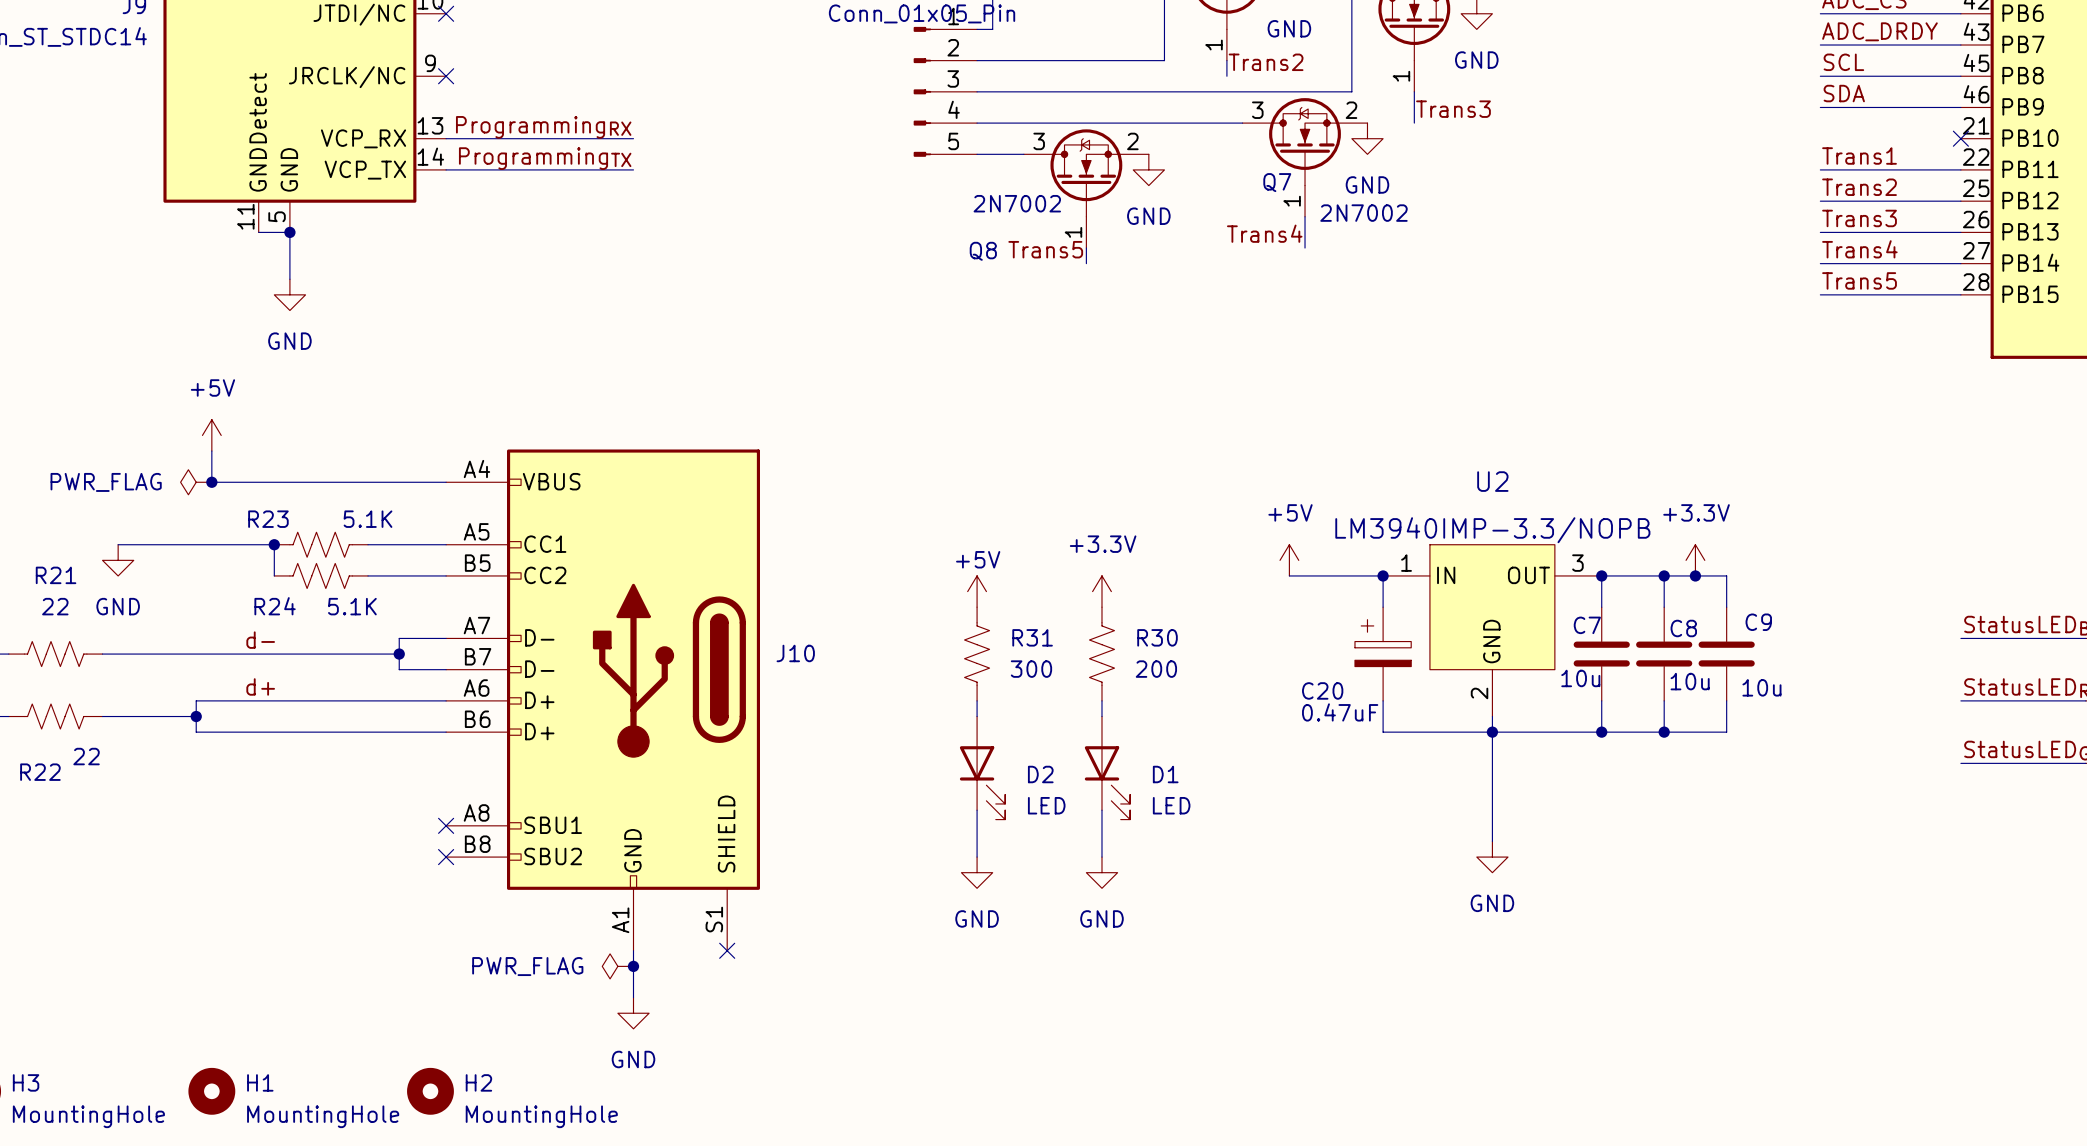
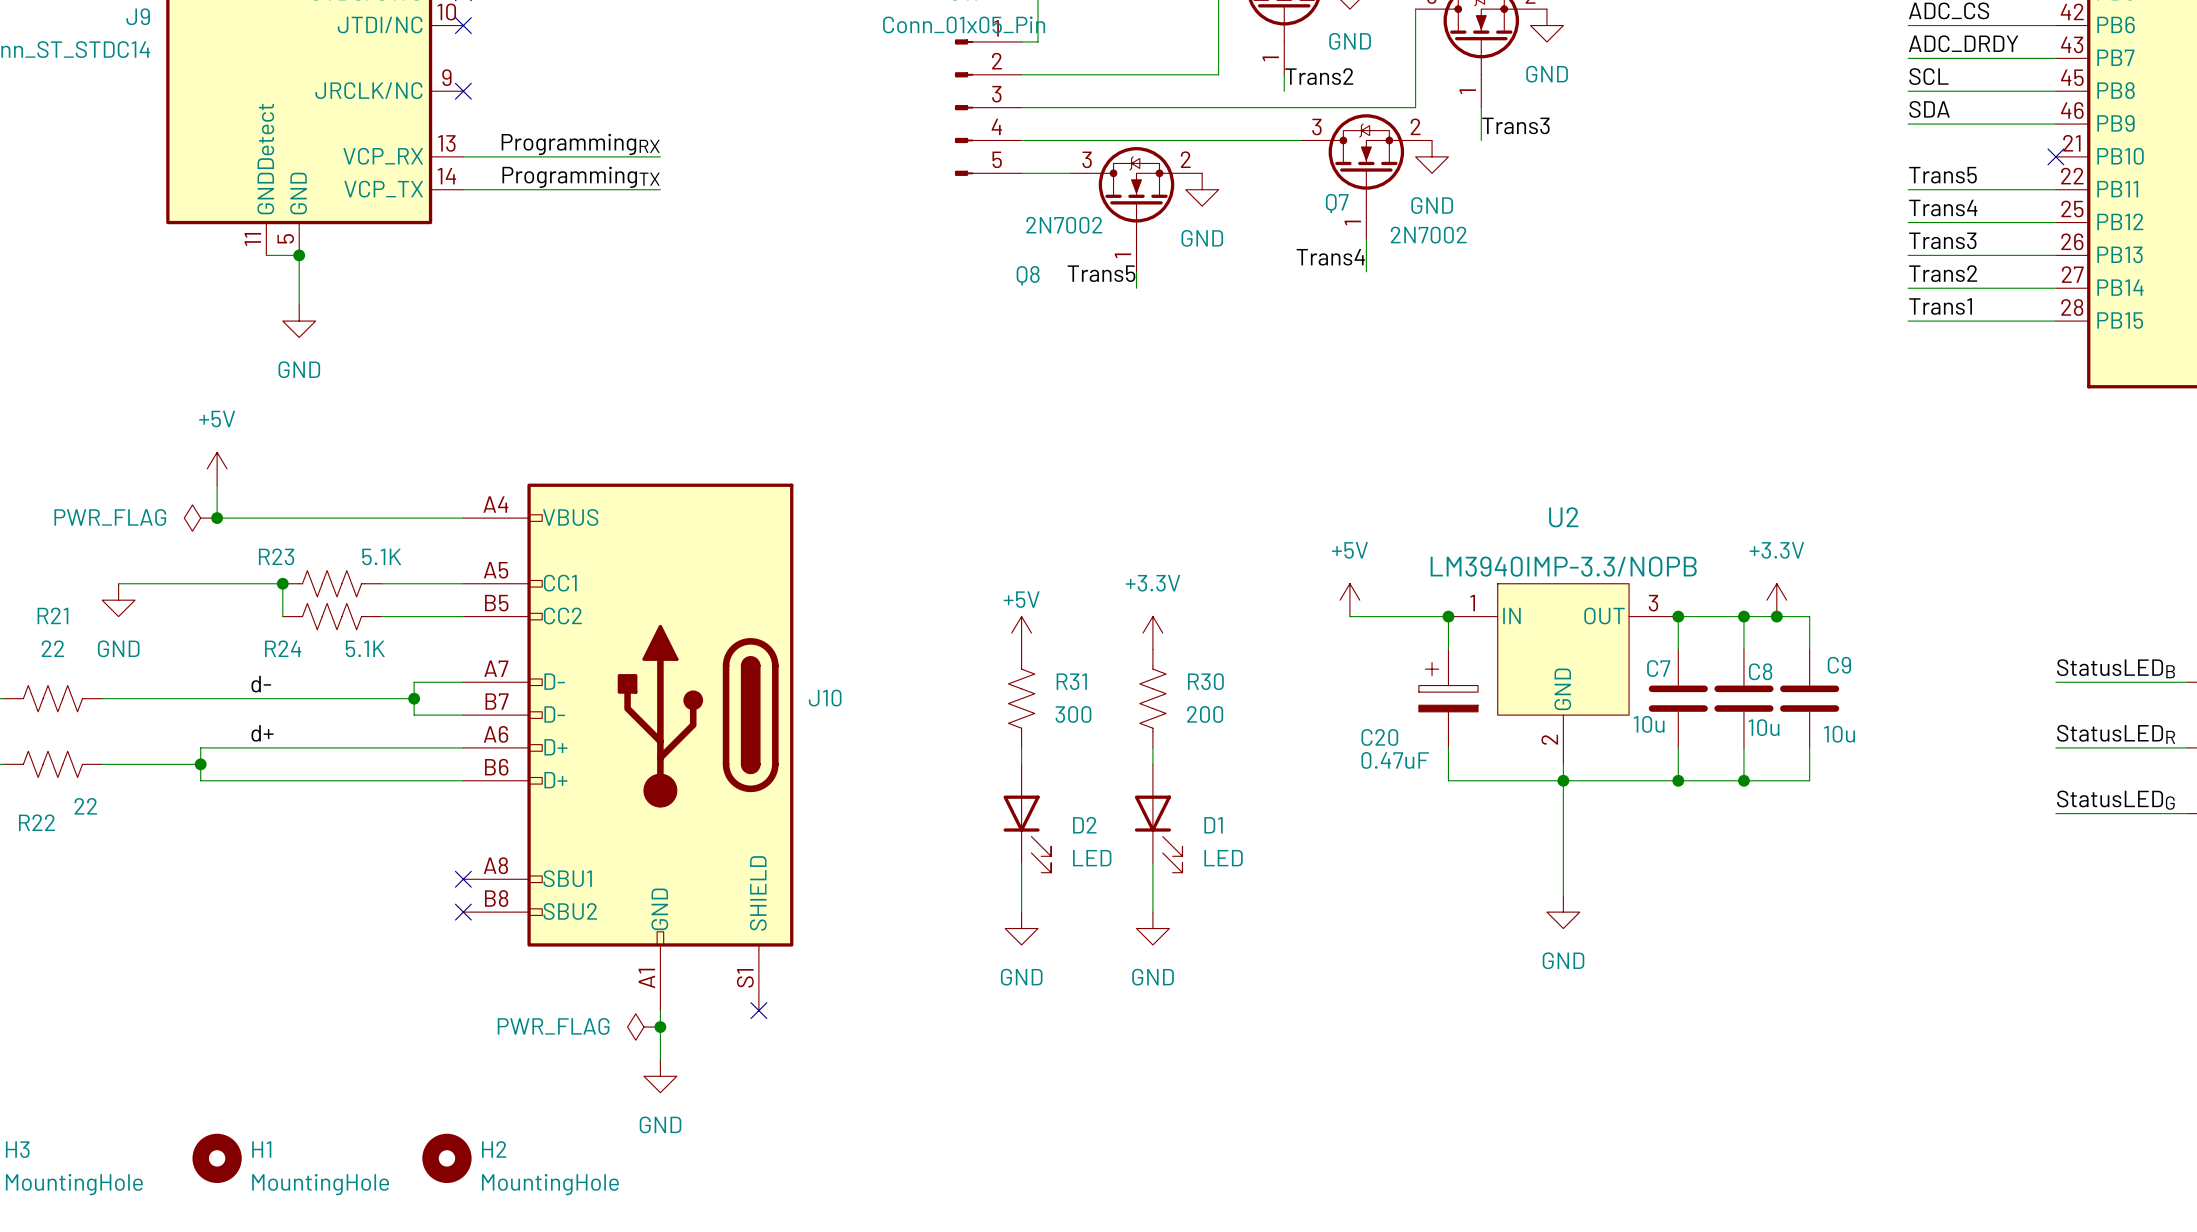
label: Trans1 (1859, 156) -> Trans5 (1942, 175)
label: Trans2 (1859, 187) -> Trans4 (1943, 208)
label: Trans4 (1859, 249) -> Trans2 (1943, 273)
label: Trans5 (1859, 280) -> Trans1 (1940, 306)

